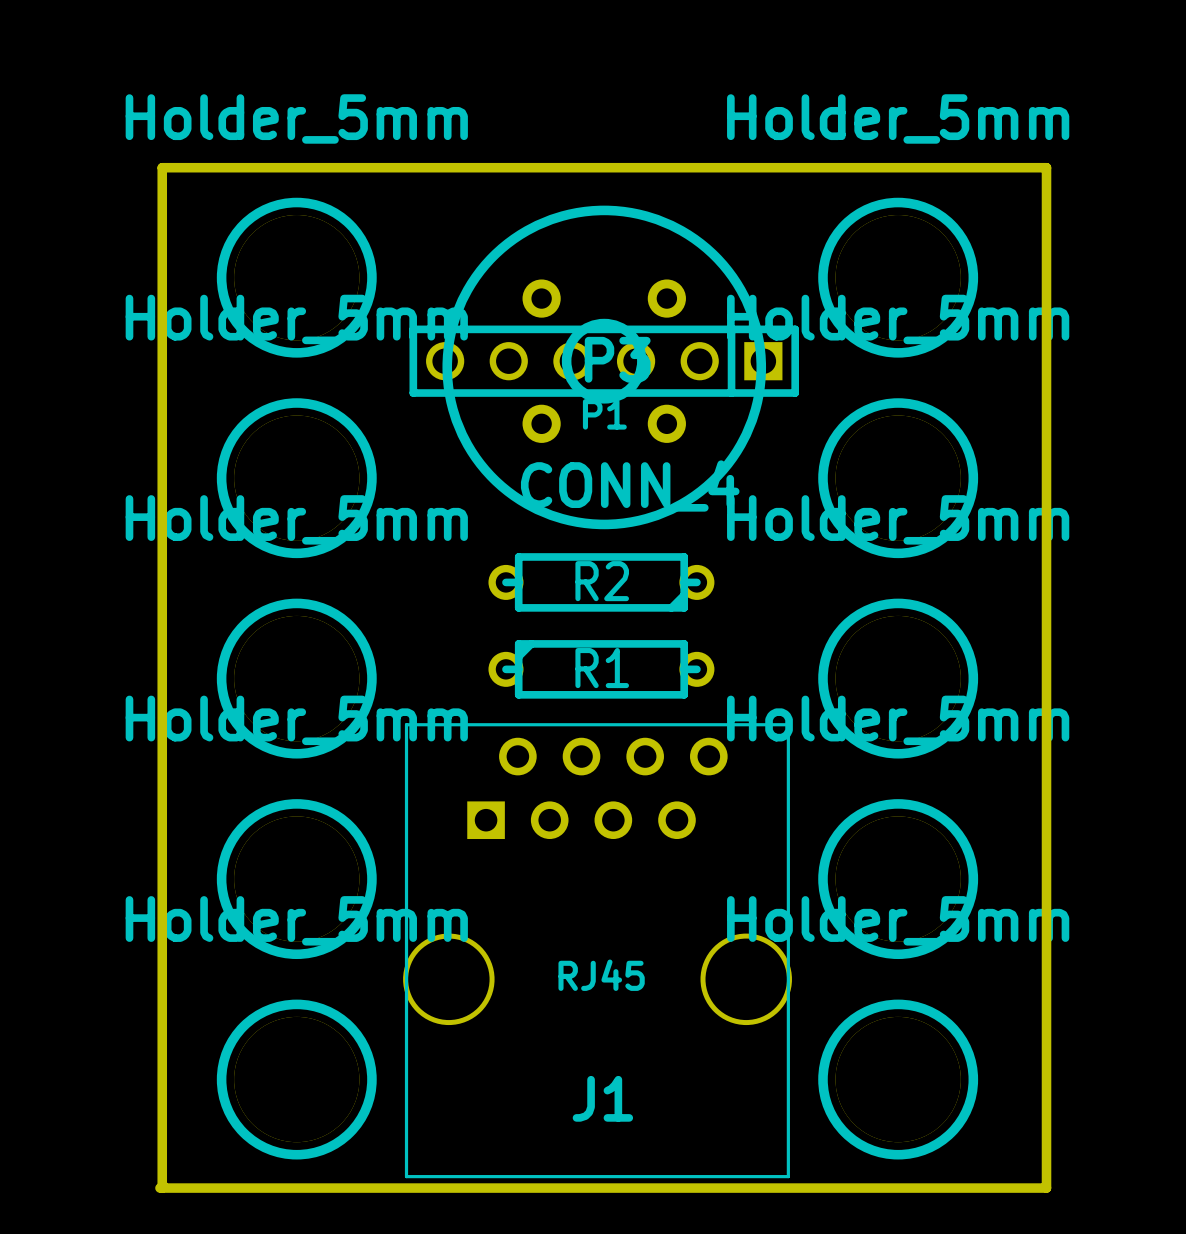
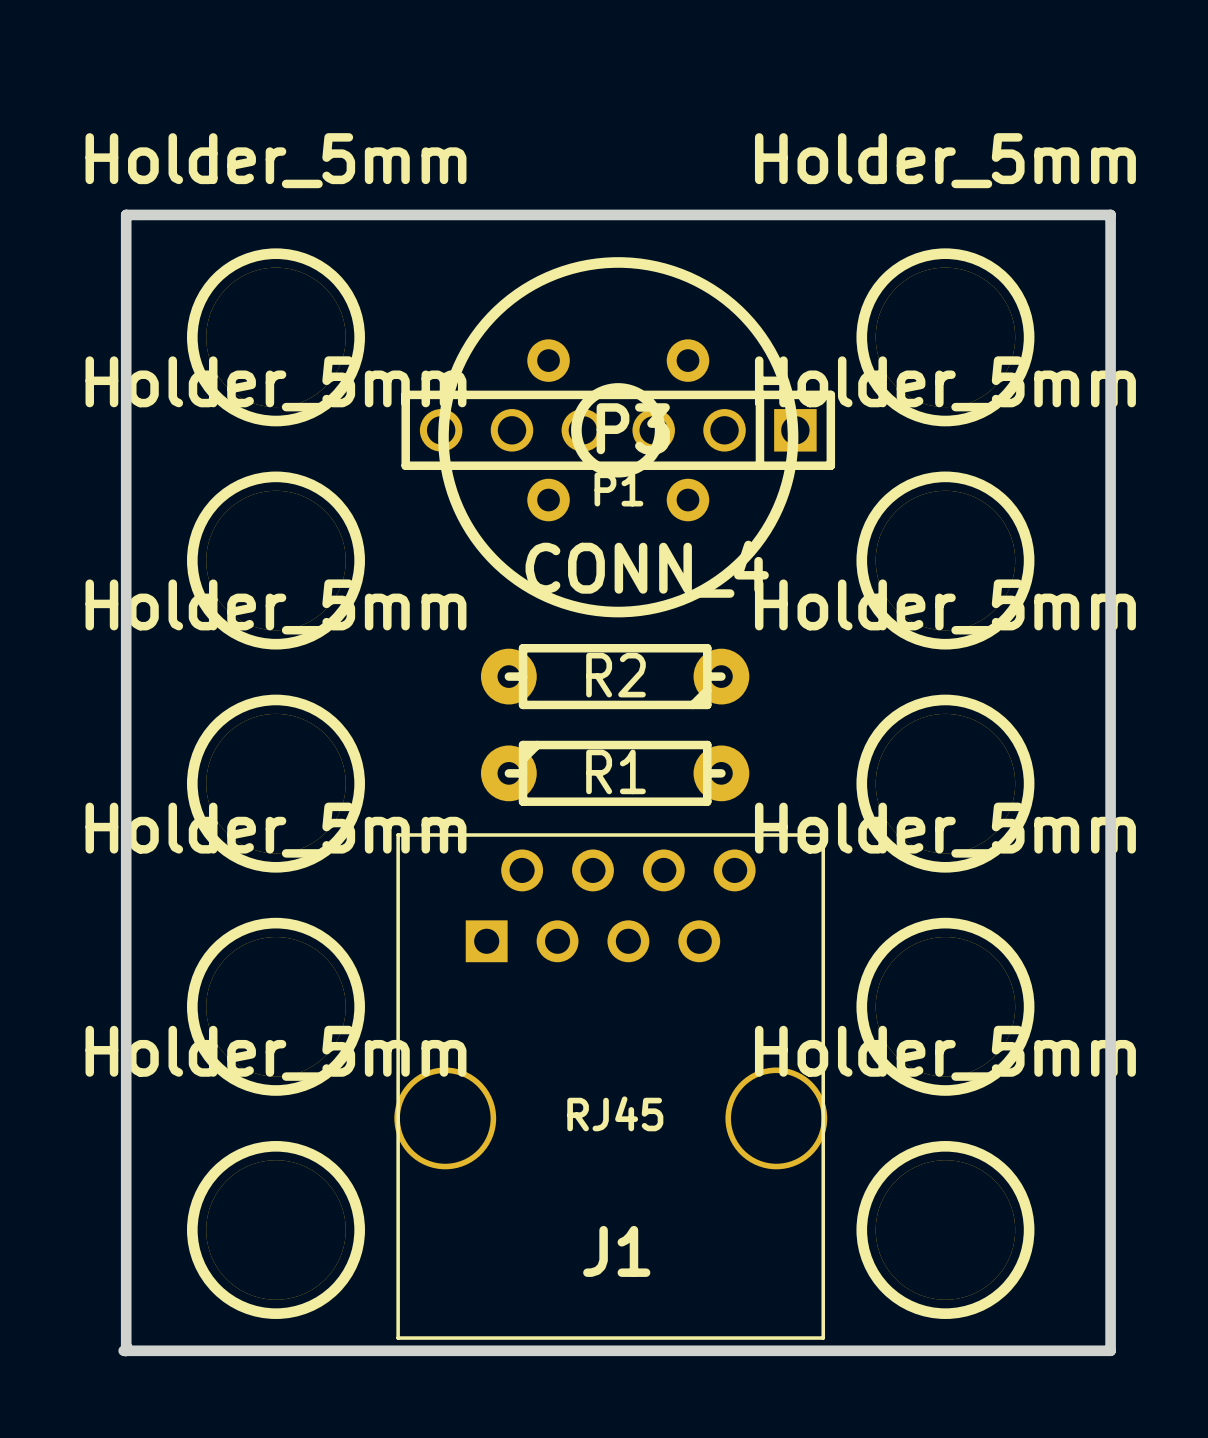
R2 footprint: [488, 553, 715, 612] -> [480, 643, 750, 710]
R1 footprint: [488, 640, 715, 699] -> [480, 740, 750, 806]

